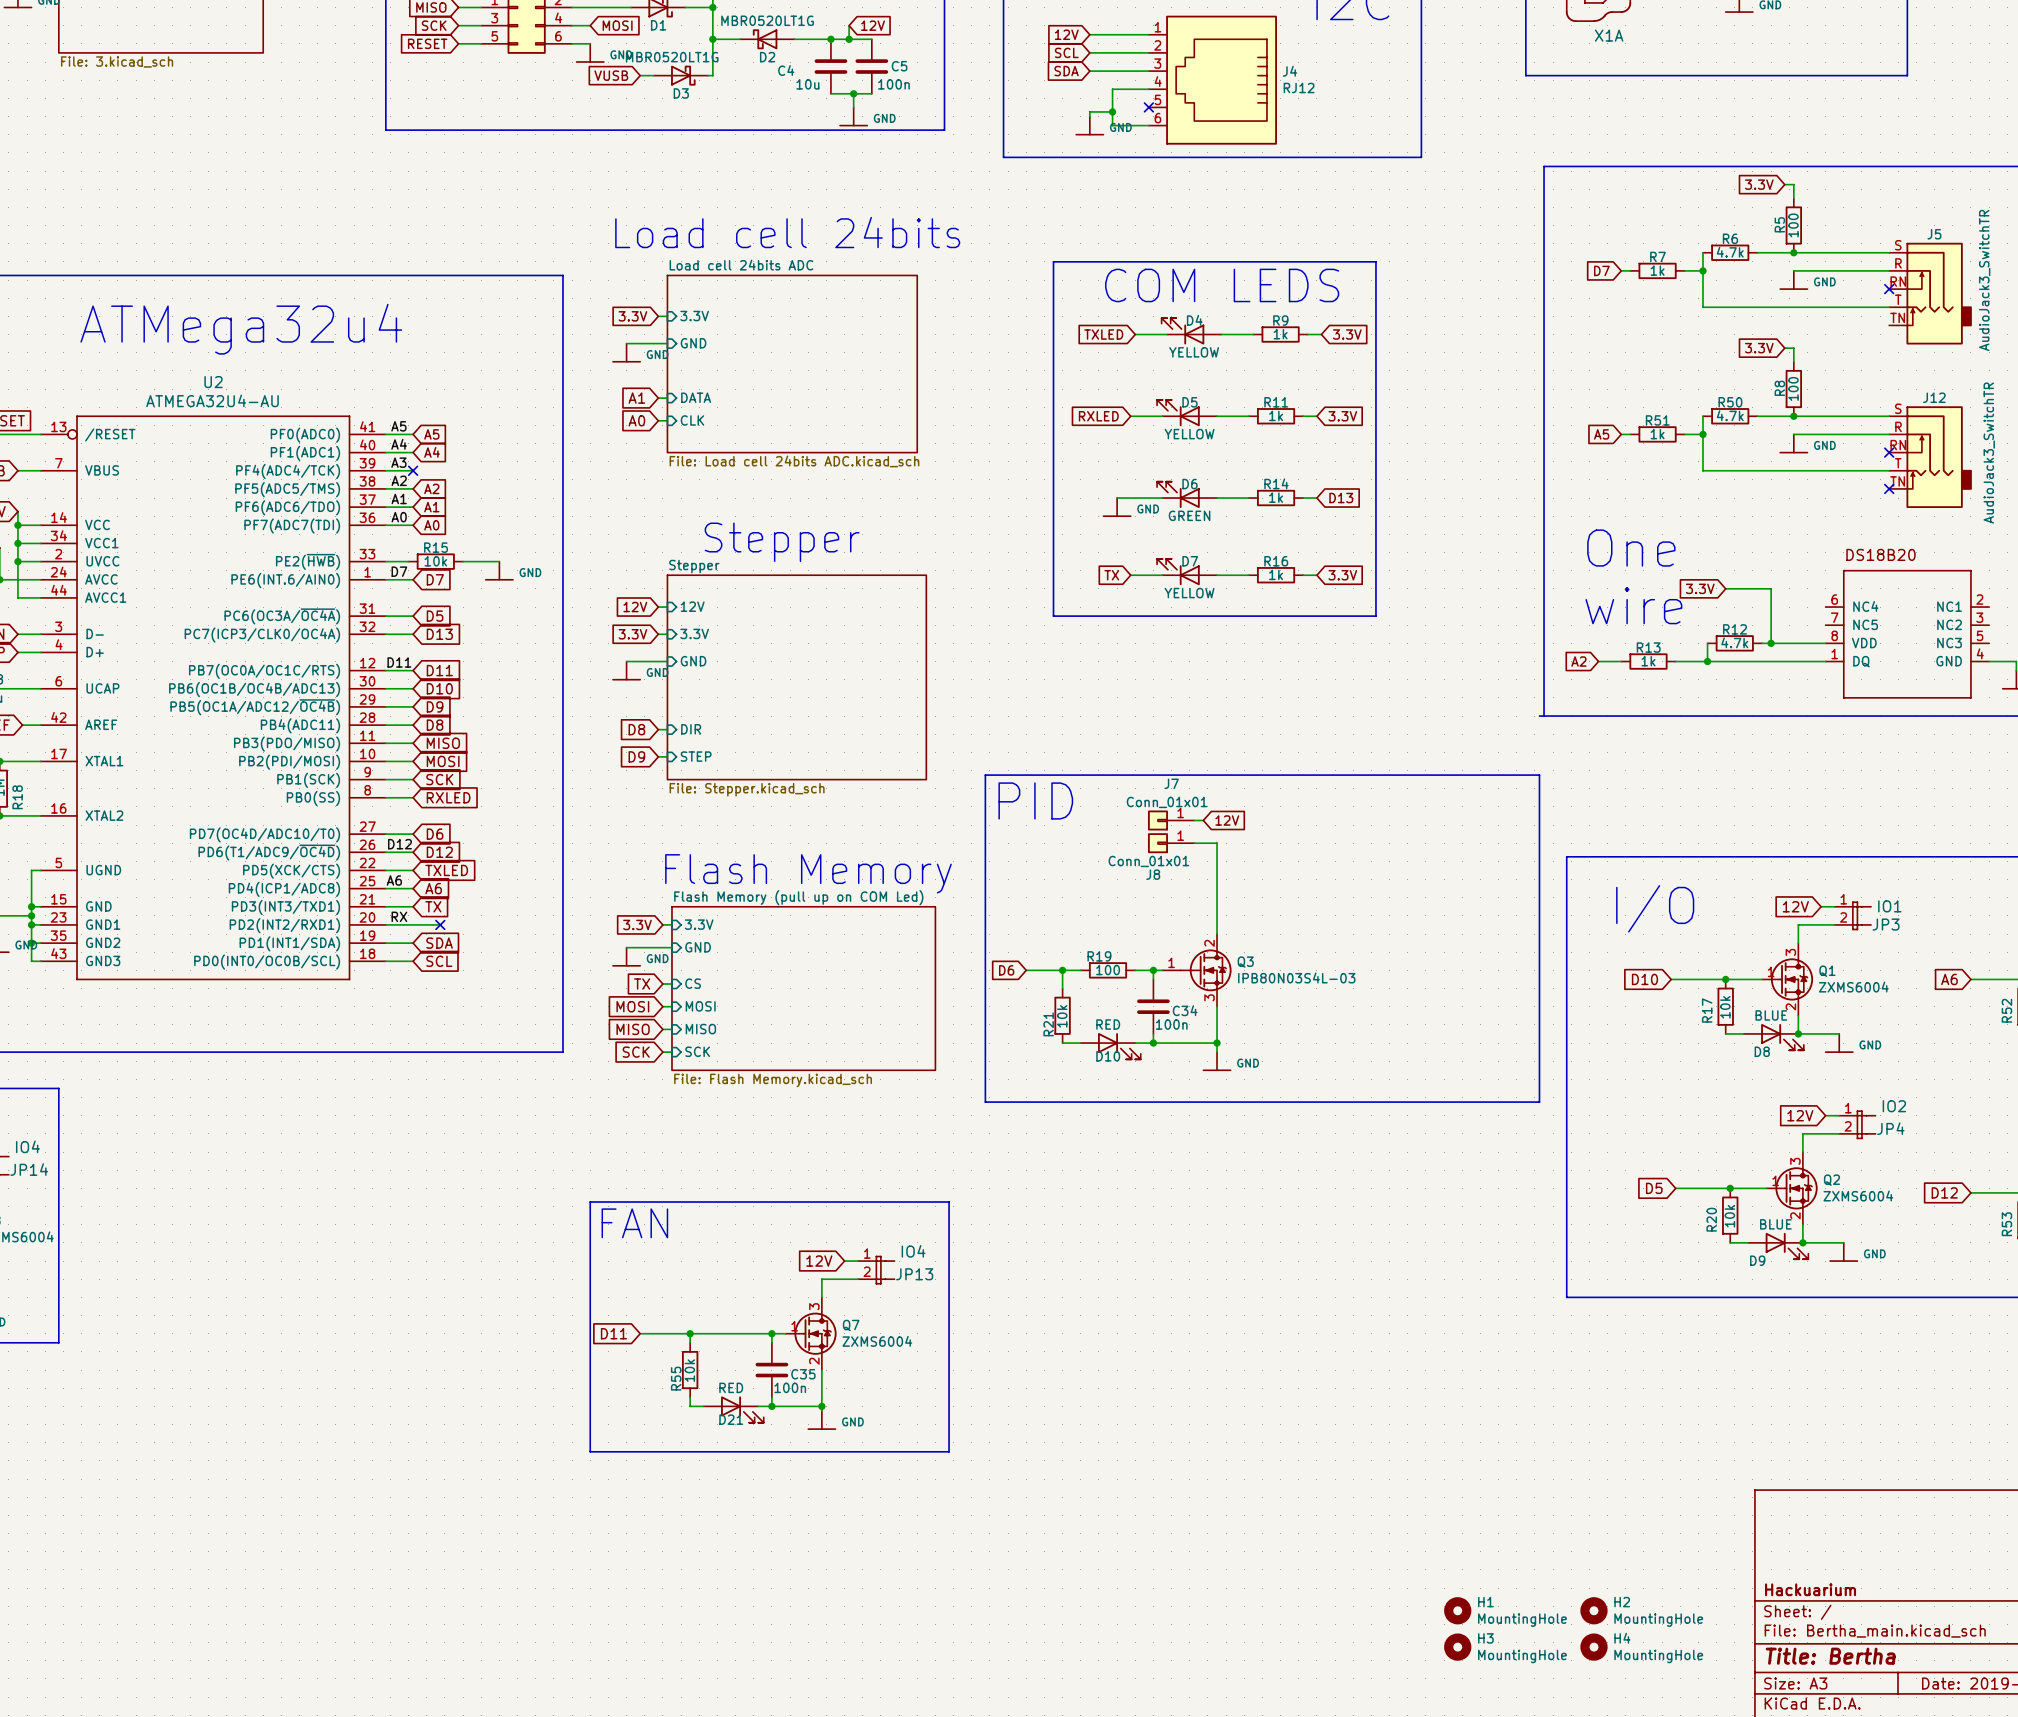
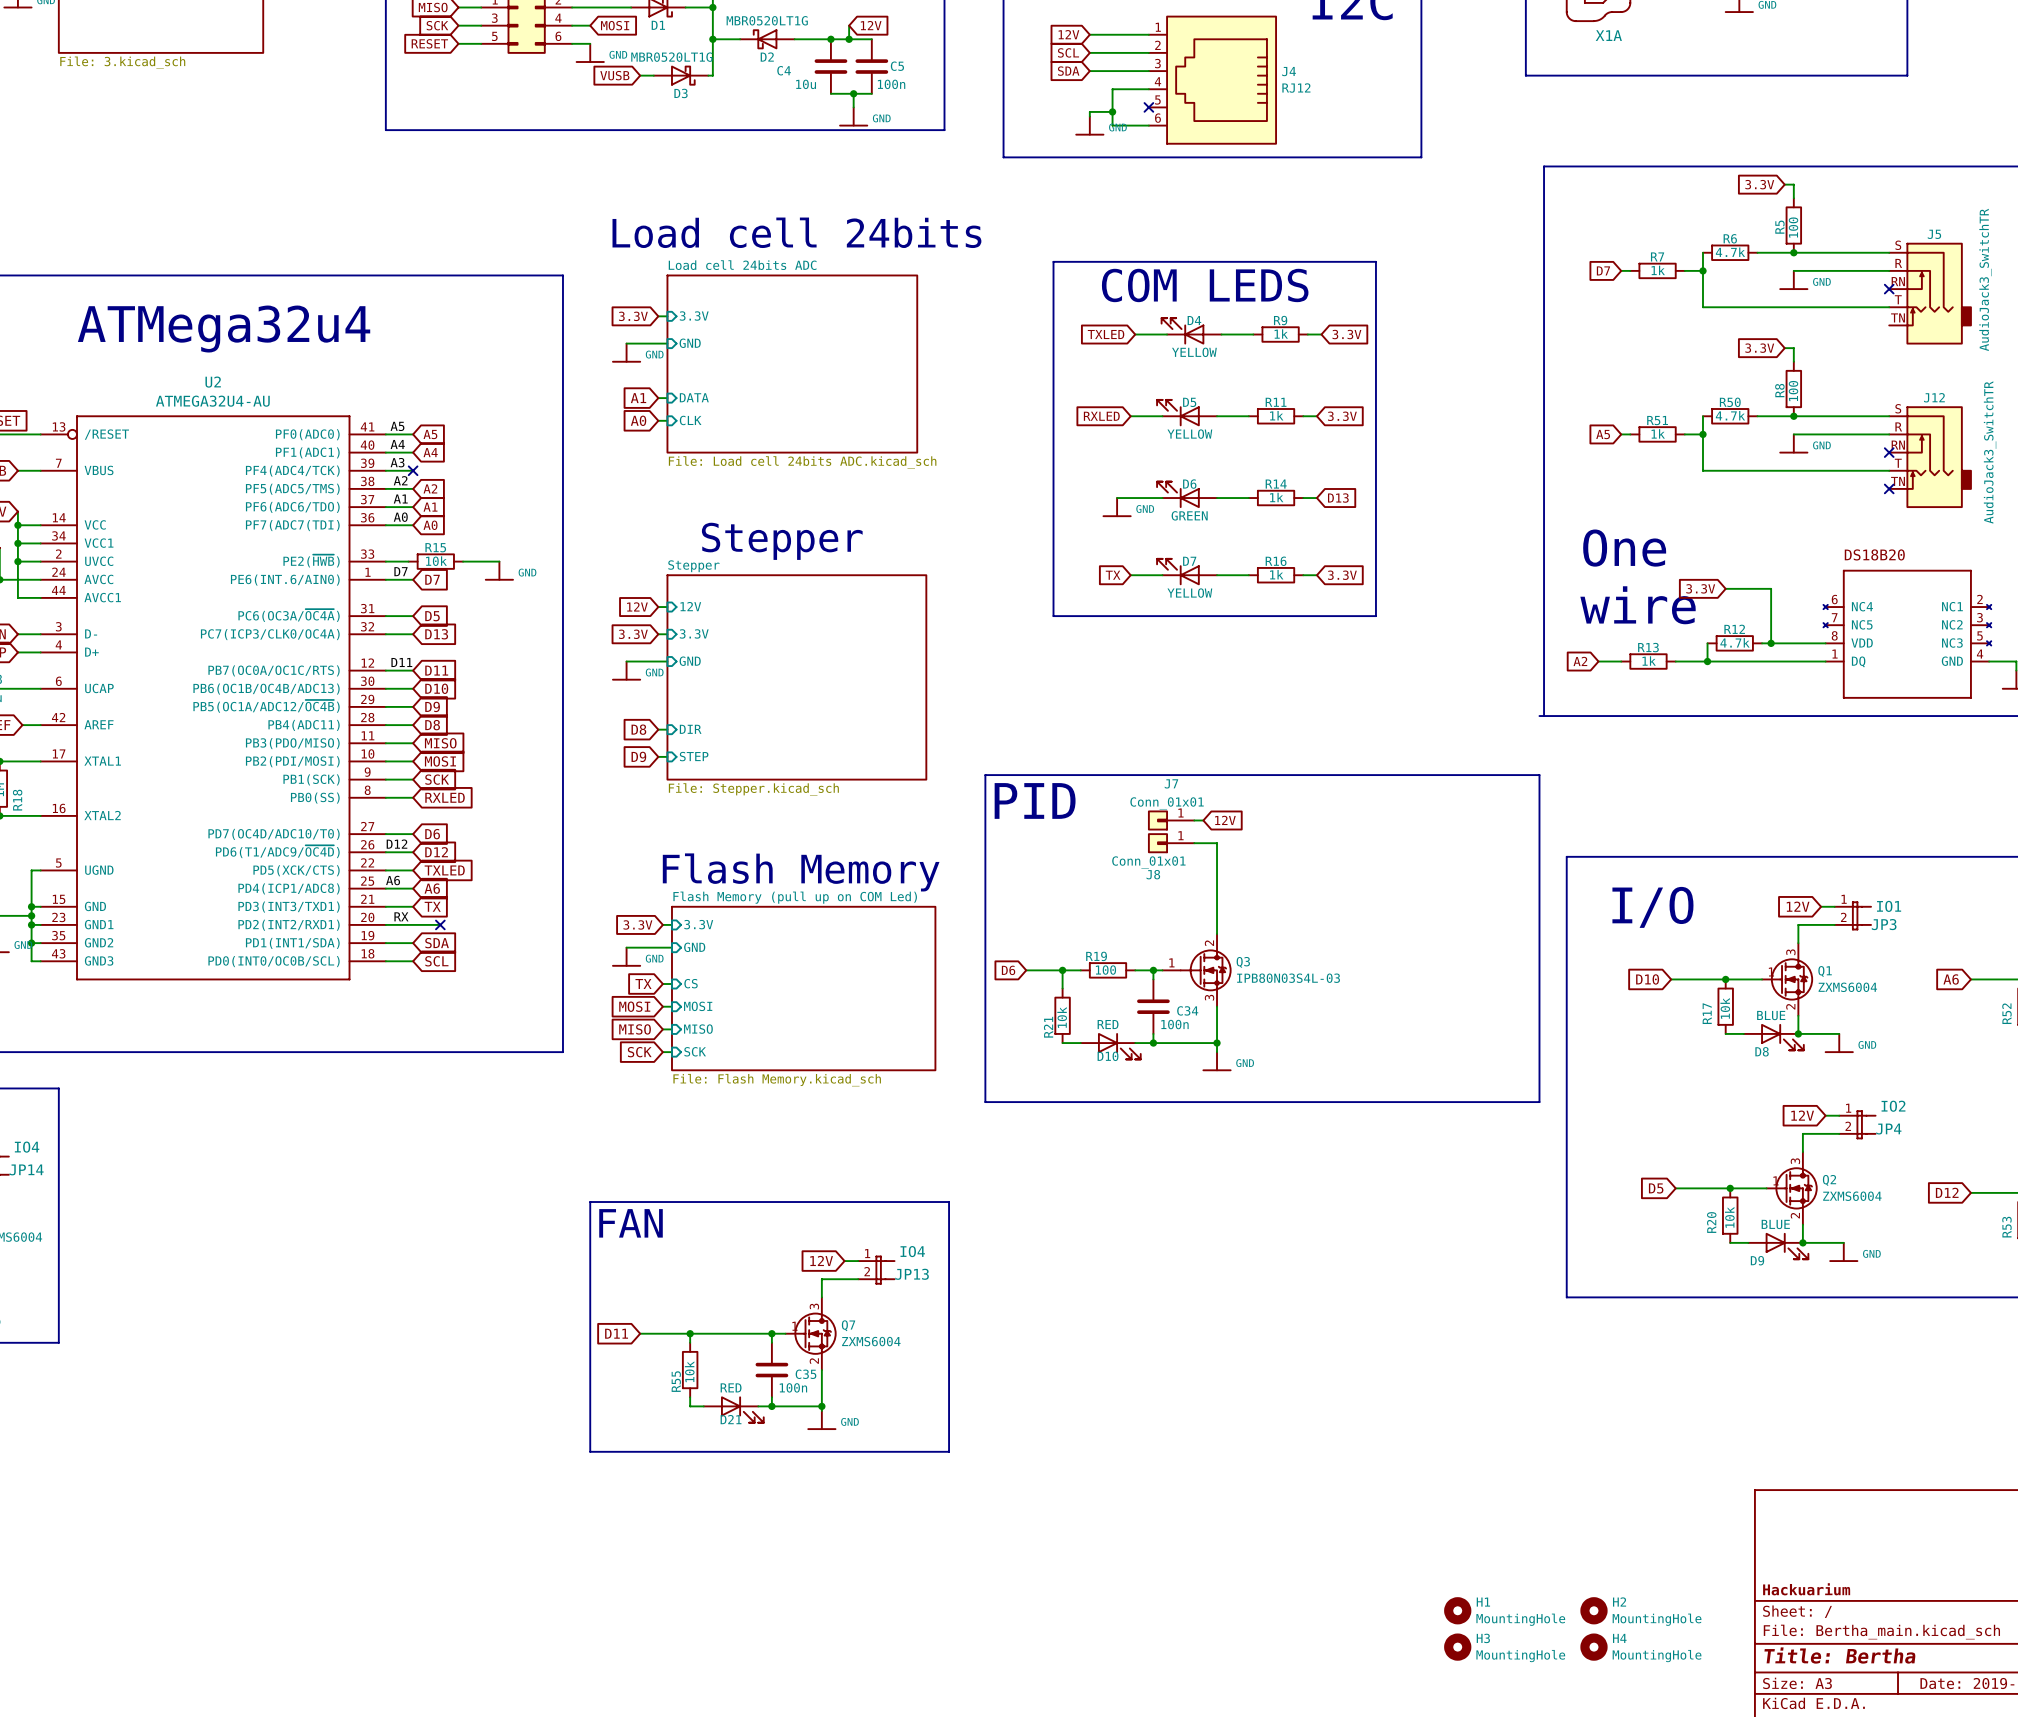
part symbol: [1825, 570, 1990, 698] -> [1823, 570, 1992, 698]

